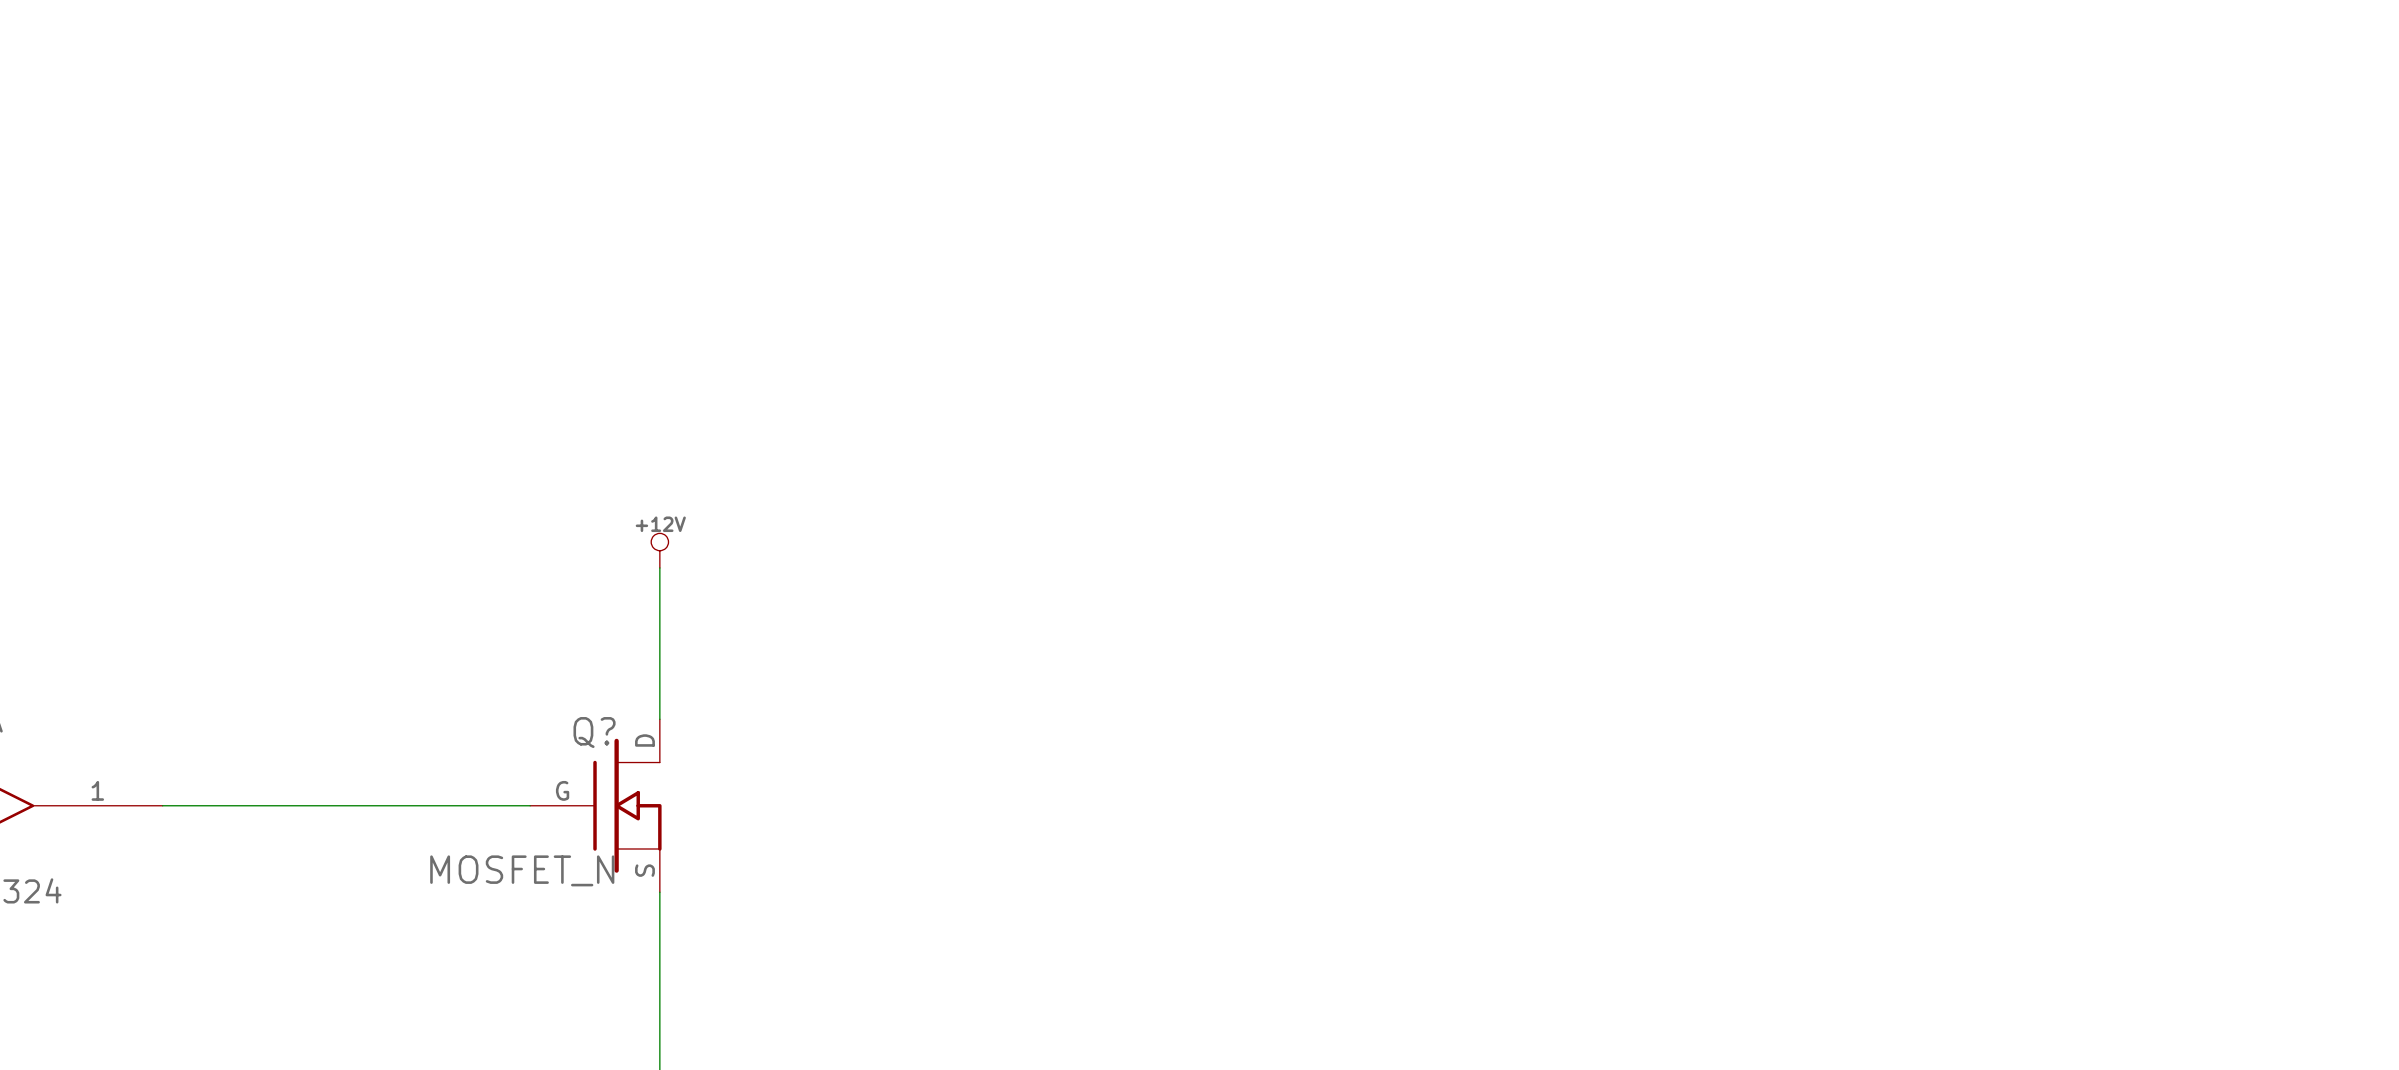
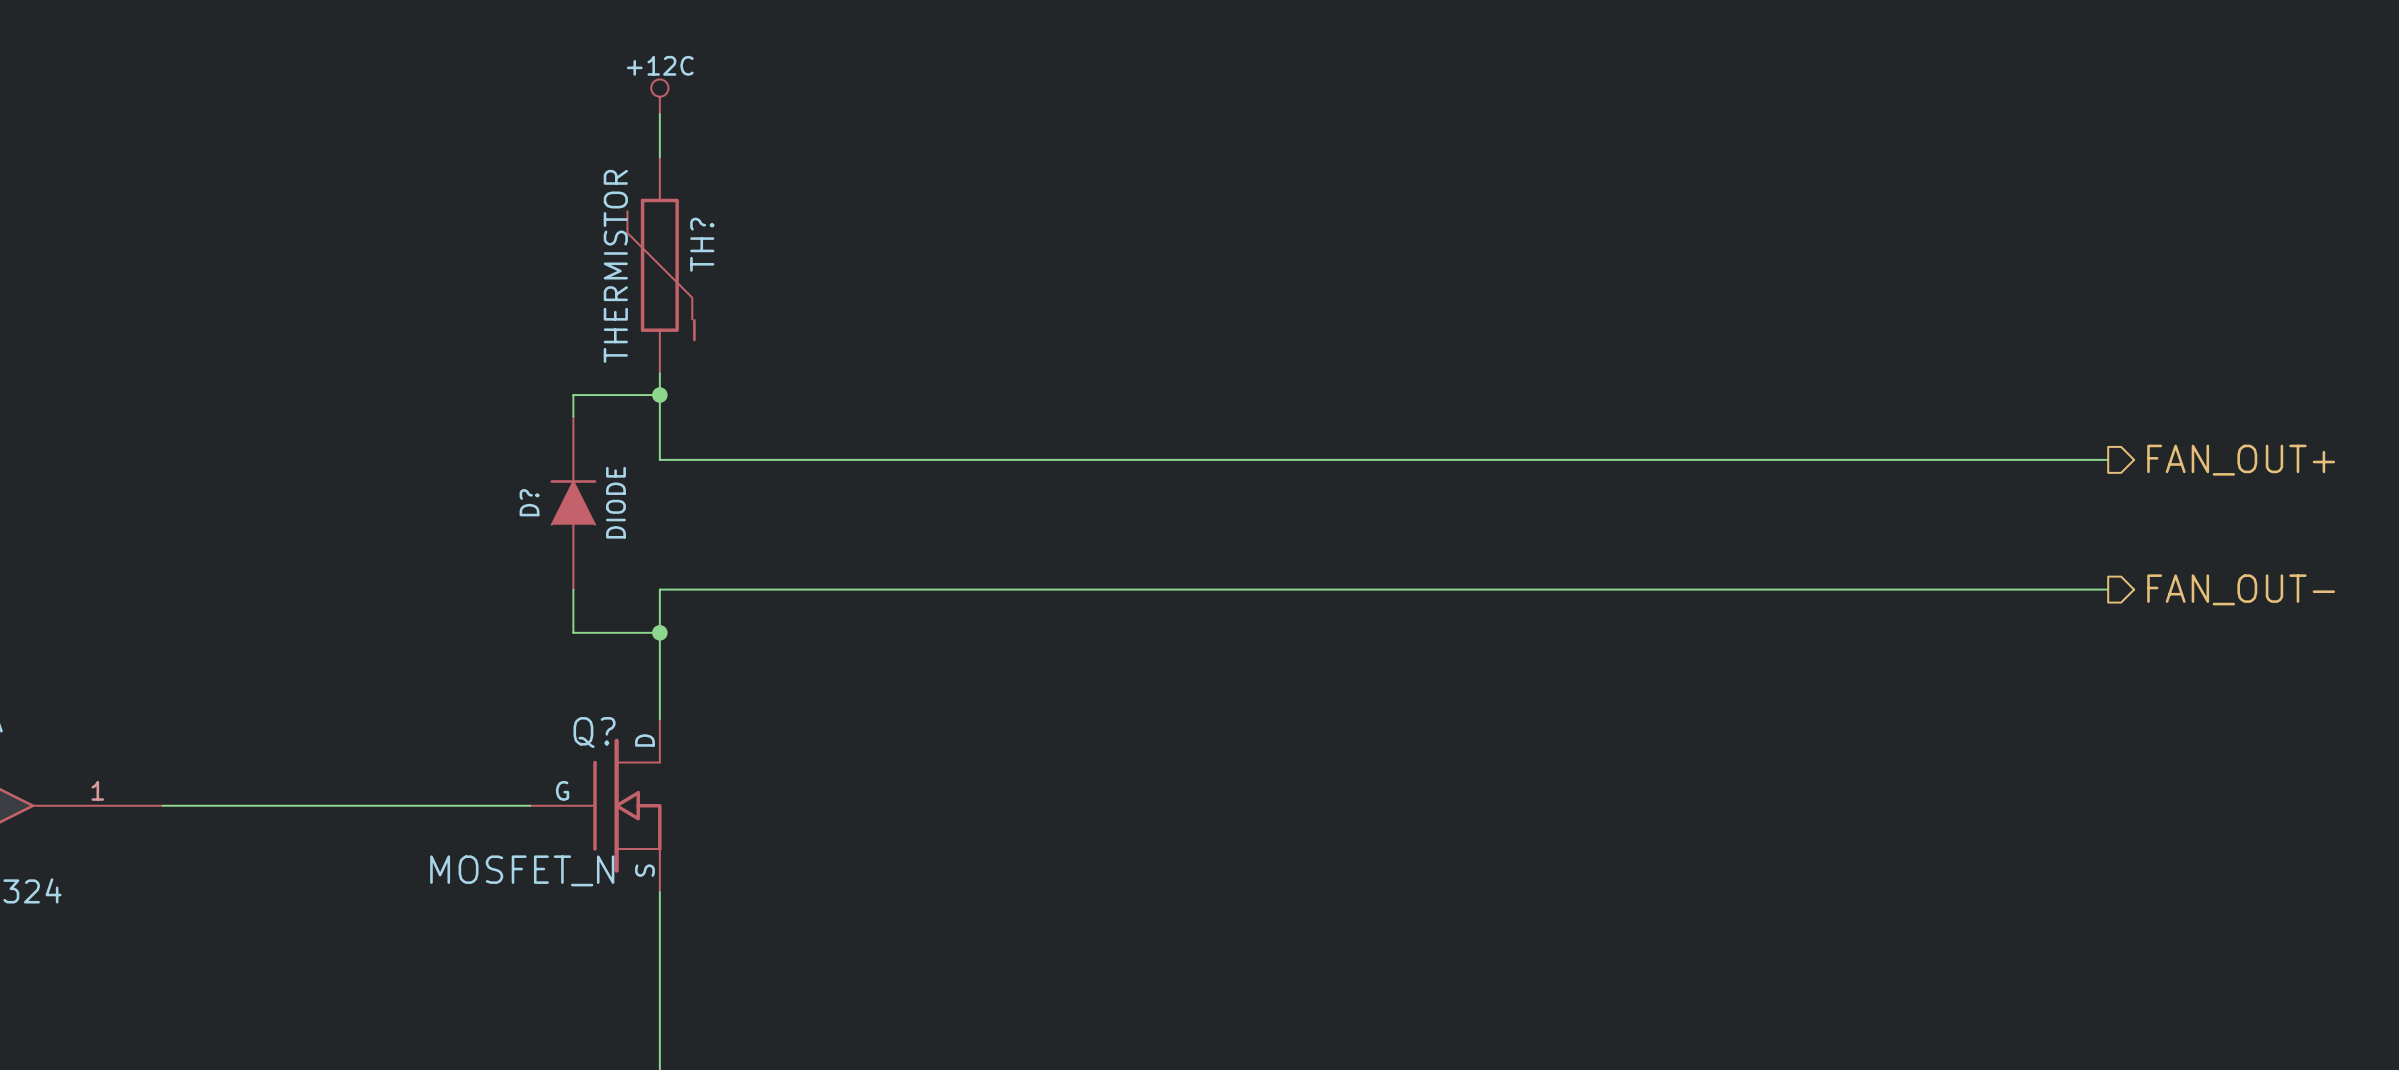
power symbol: none -> +12C (659, 96)
wire: none -> (659, 114) (659, 157)
TH?: none -> THERMISTOR (659, 265)
wire: none -> (659, 373) (659, 459) (2108, 459)
wire: none -> (659, 395) (573, 395) (573, 416)
junction: none -> (659, 395)
hierarchical label: none -> FAN_OUT+ (2241, 460)
D?: none -> DIODE (573, 503)
power symbol: +12V (659, 550) -> none
wire: (659, 567) (659, 589) -> (2108, 589) (659, 589)
wire: none -> (573, 589) (573, 632) (659, 632)
hierarchical label: none -> FAN_OUT- (2241, 589)
junction: none -> (659, 632)

